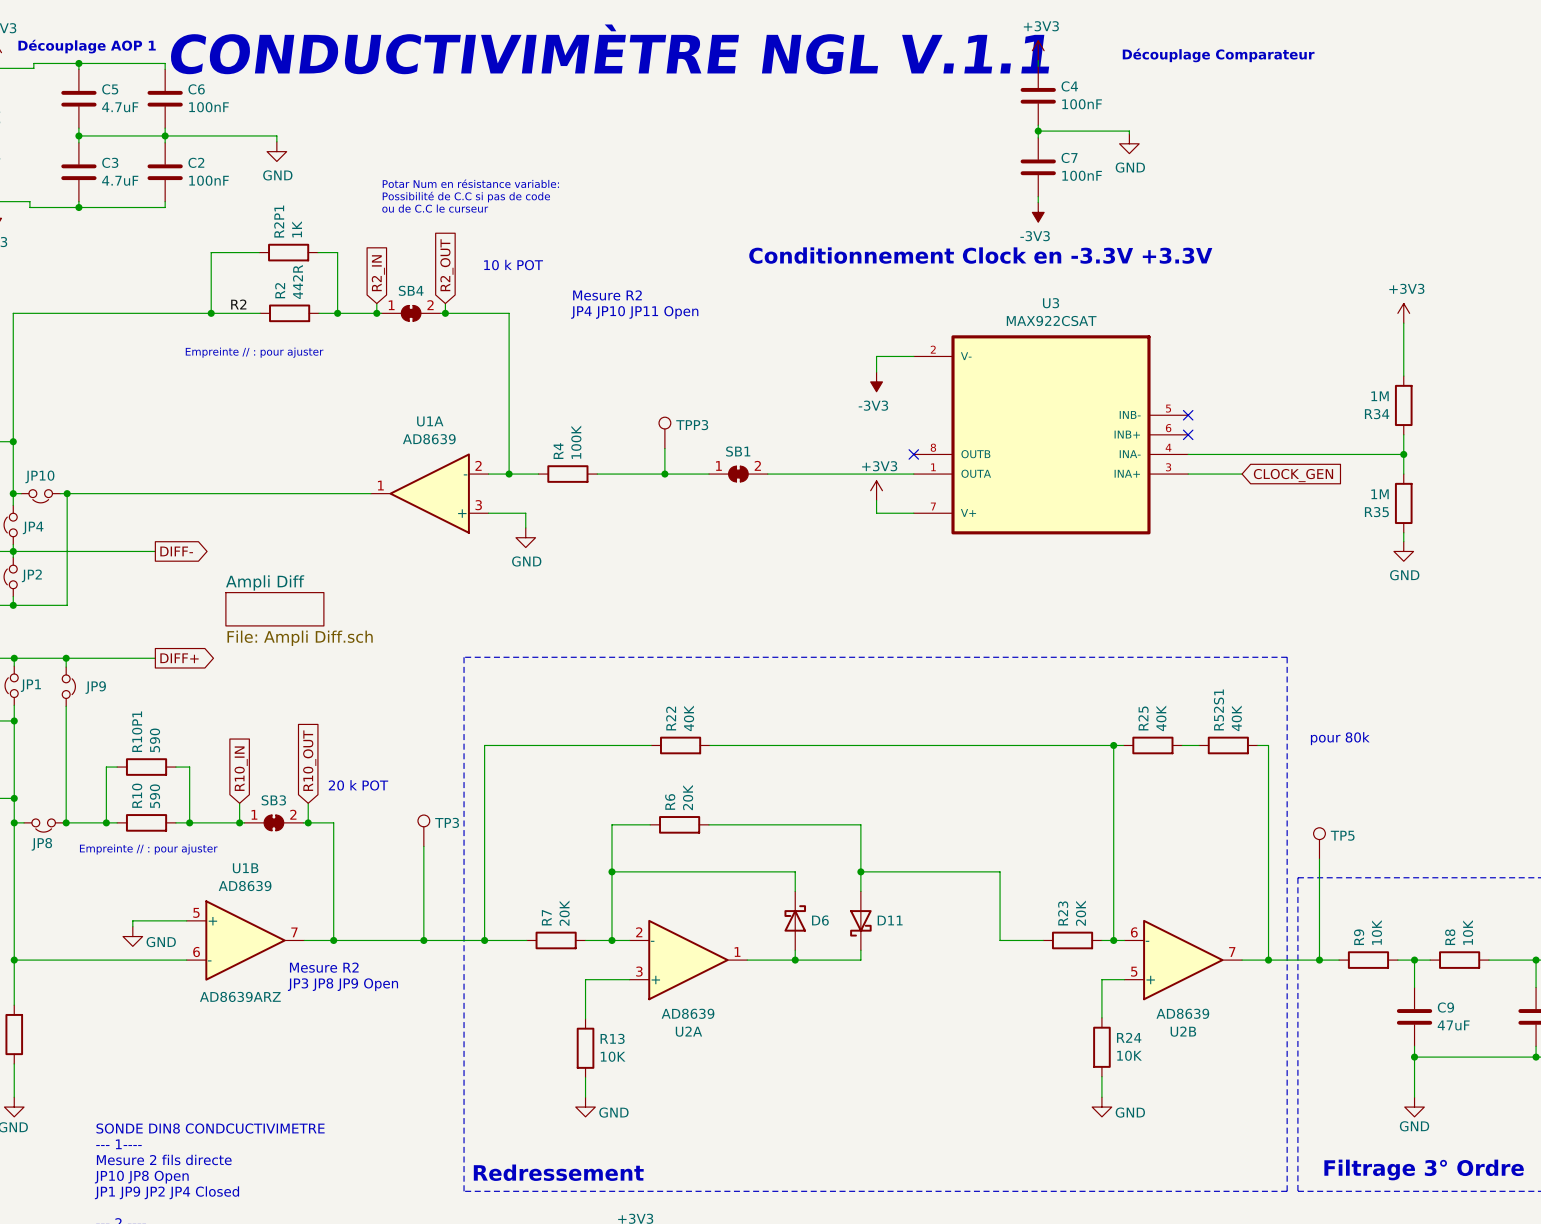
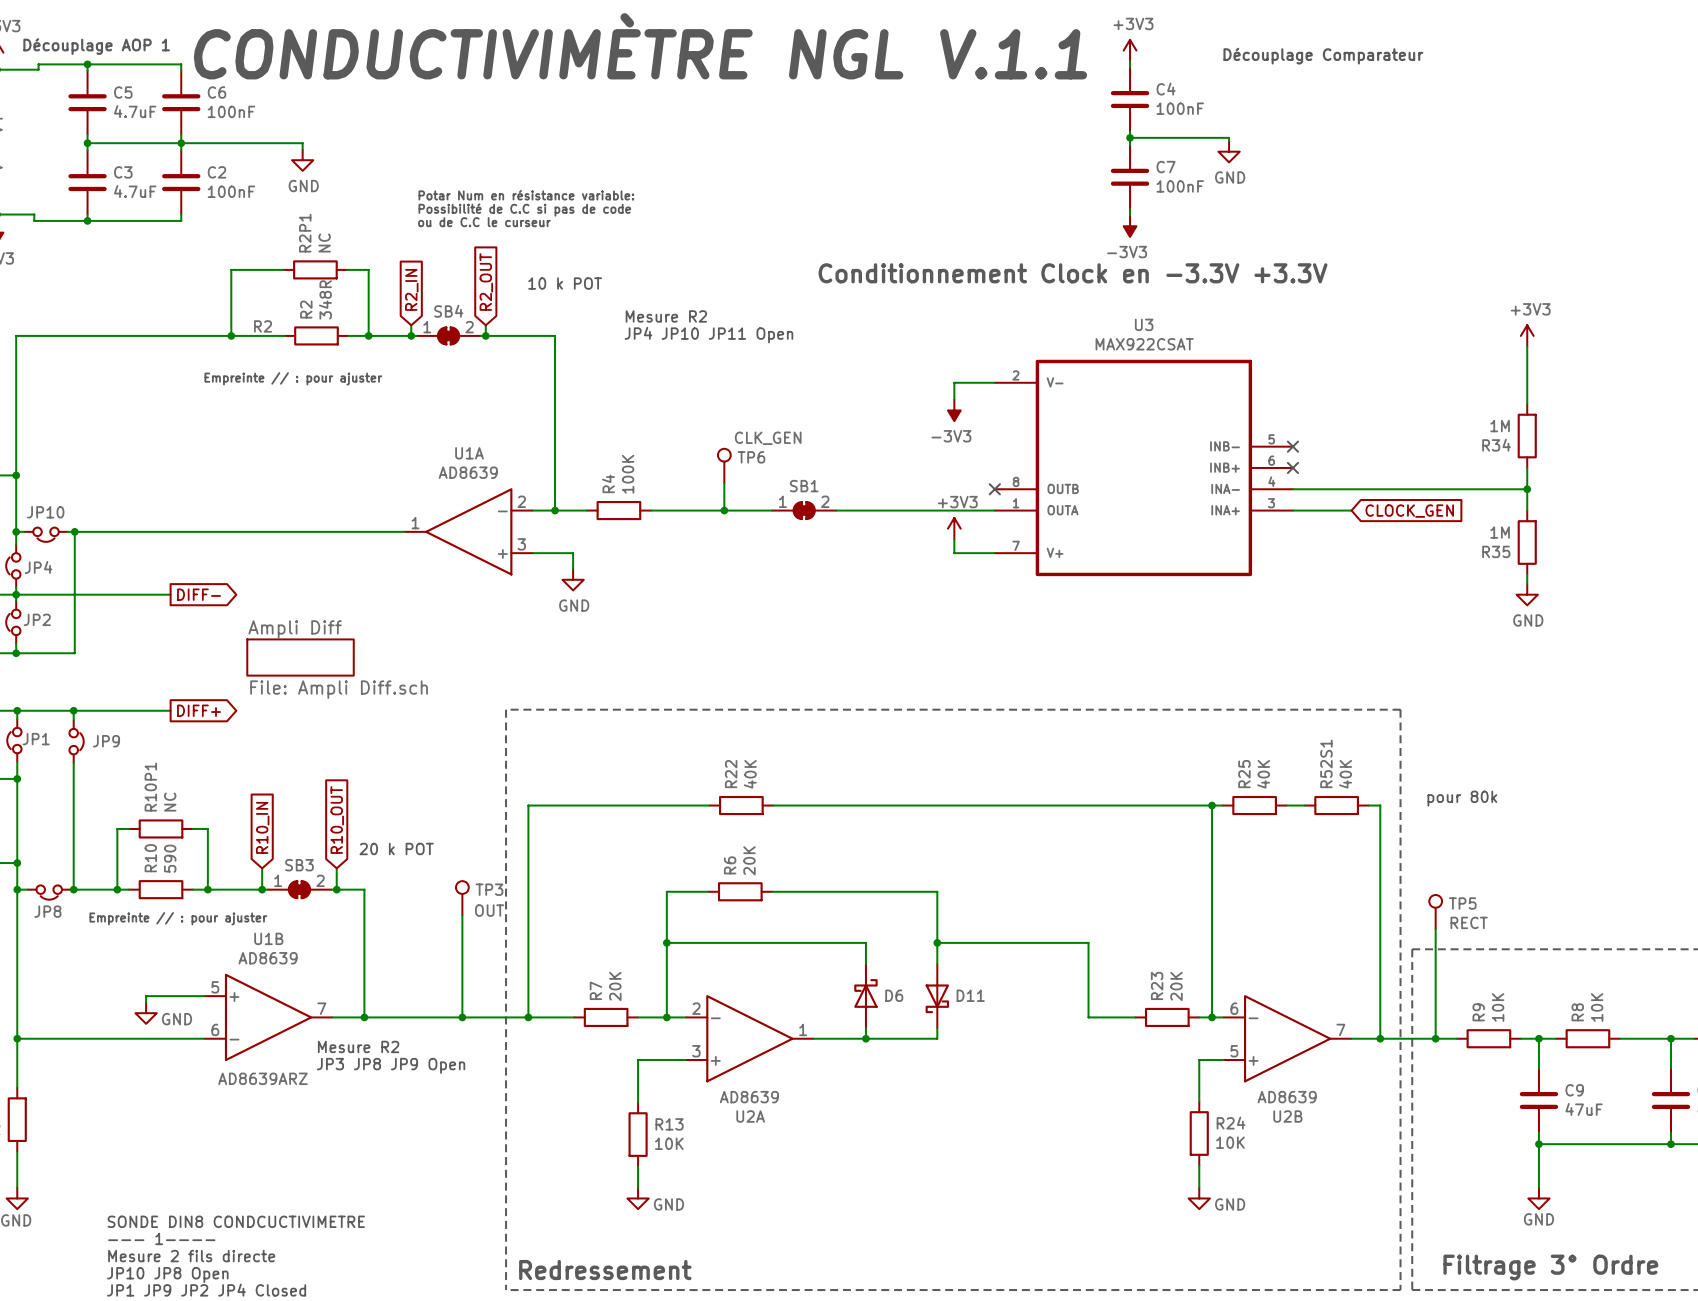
R2P1 value: 1K (297, 229) -> NC (324, 243)
R2 value: 442R (297, 281) -> 348R (325, 299)
TPP3 value: none -> CLK_GEN (768, 438)
TPP3 name: TPP3 (692, 425) -> TP6 (751, 457)
R10P1 value: 590 (155, 740) -> NC (170, 802)
TP3 value: none -> OUT (489, 910)
TP5 value: none -> RECT (1469, 922)

